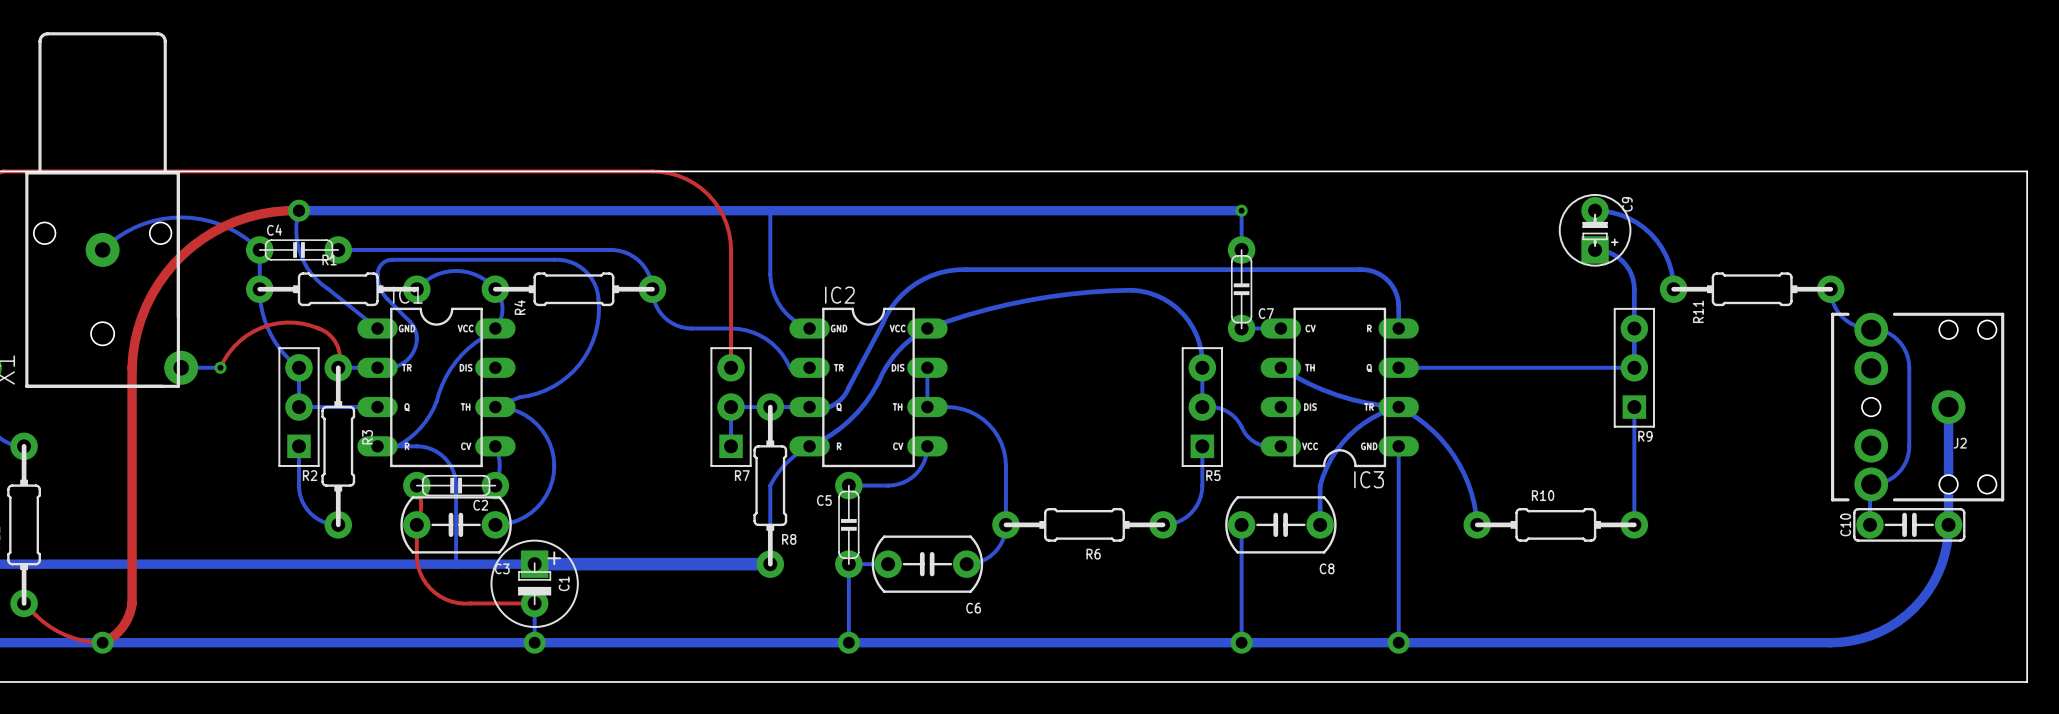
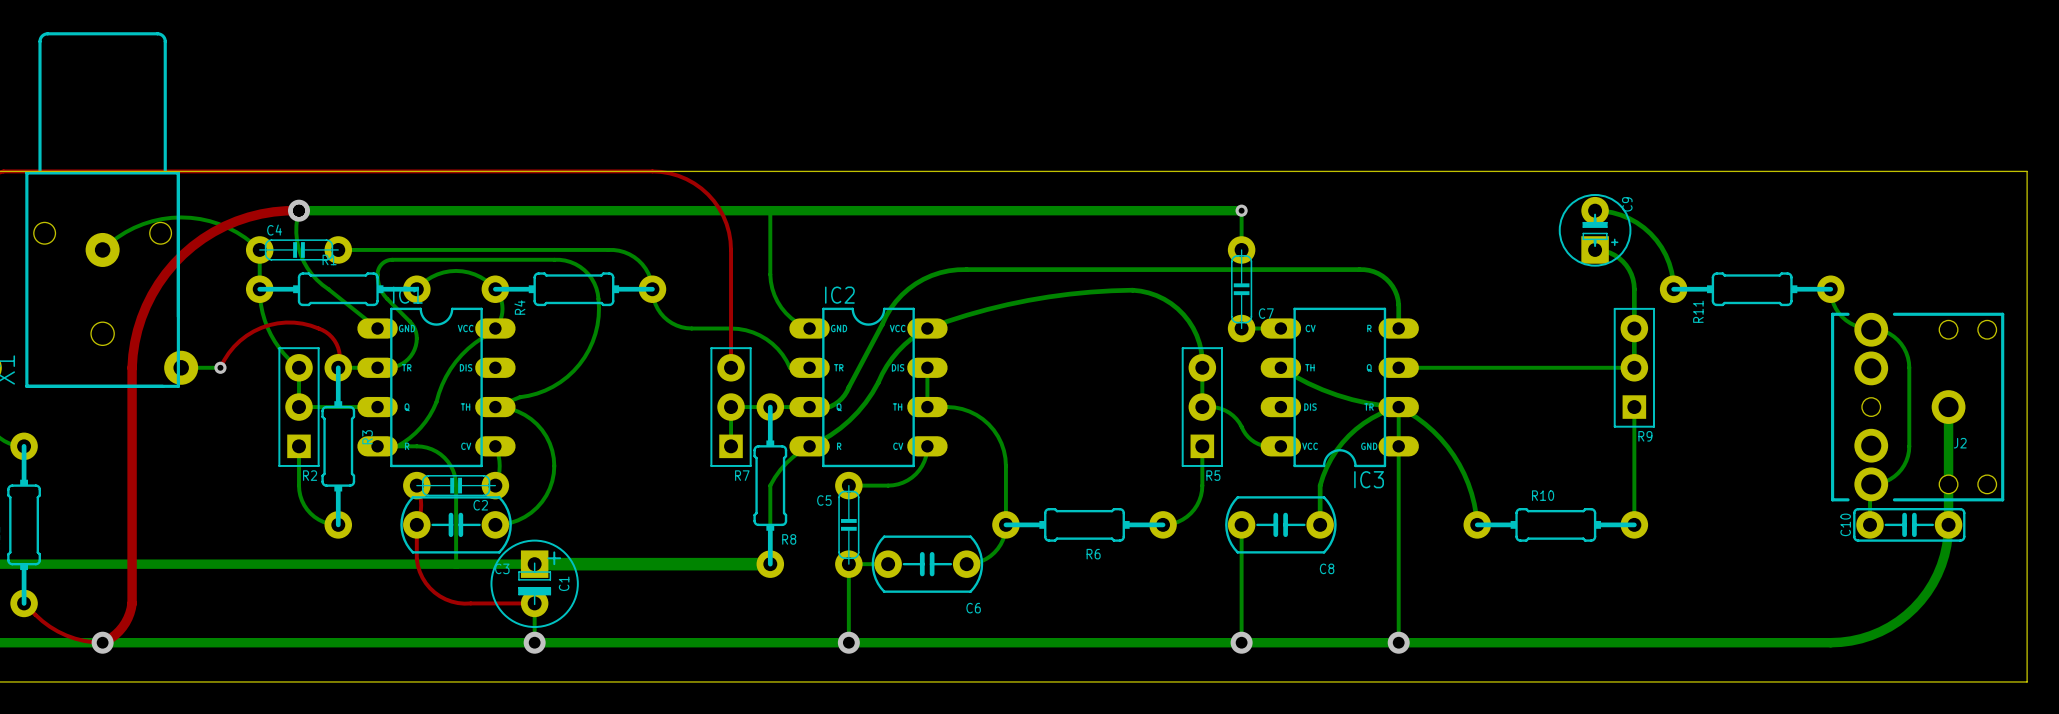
bottom track: none -> (1398, 407) (1398, 446)

